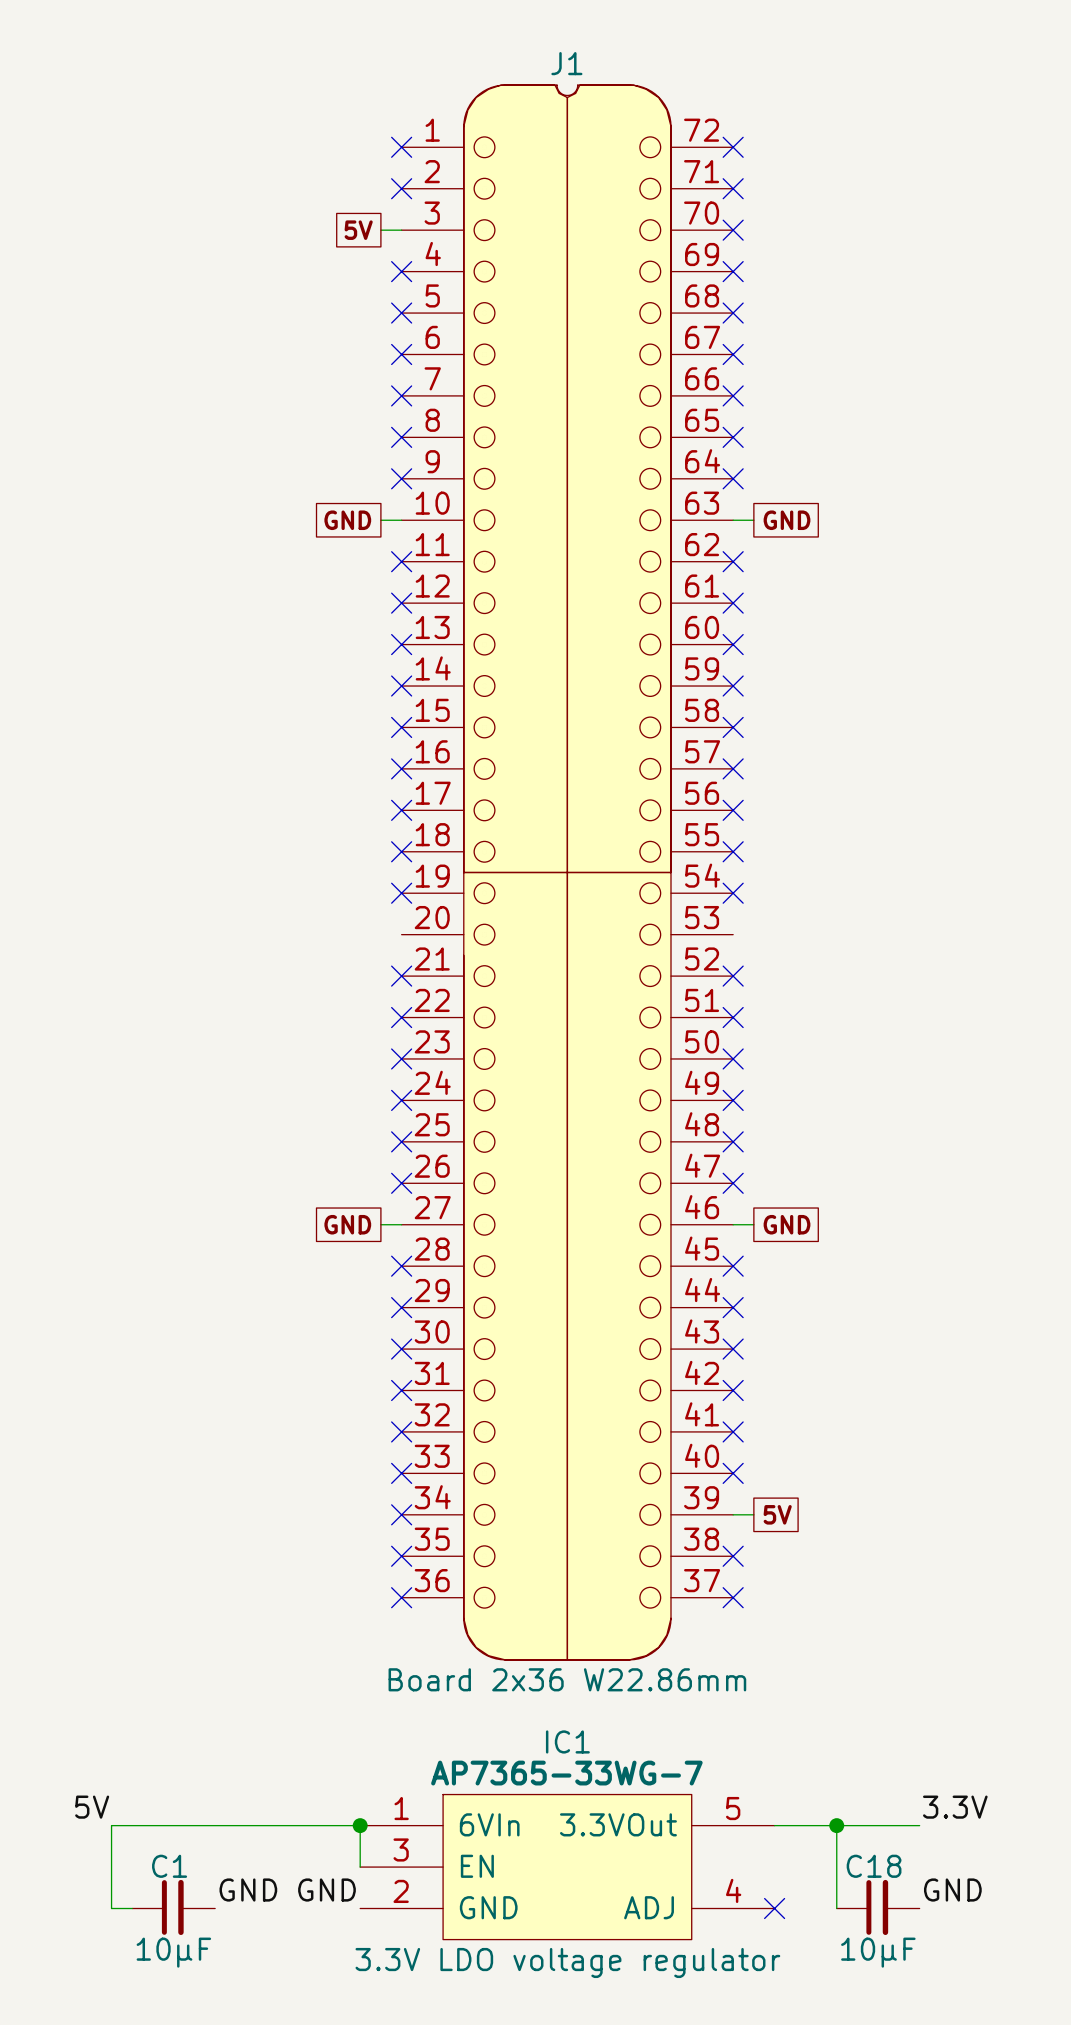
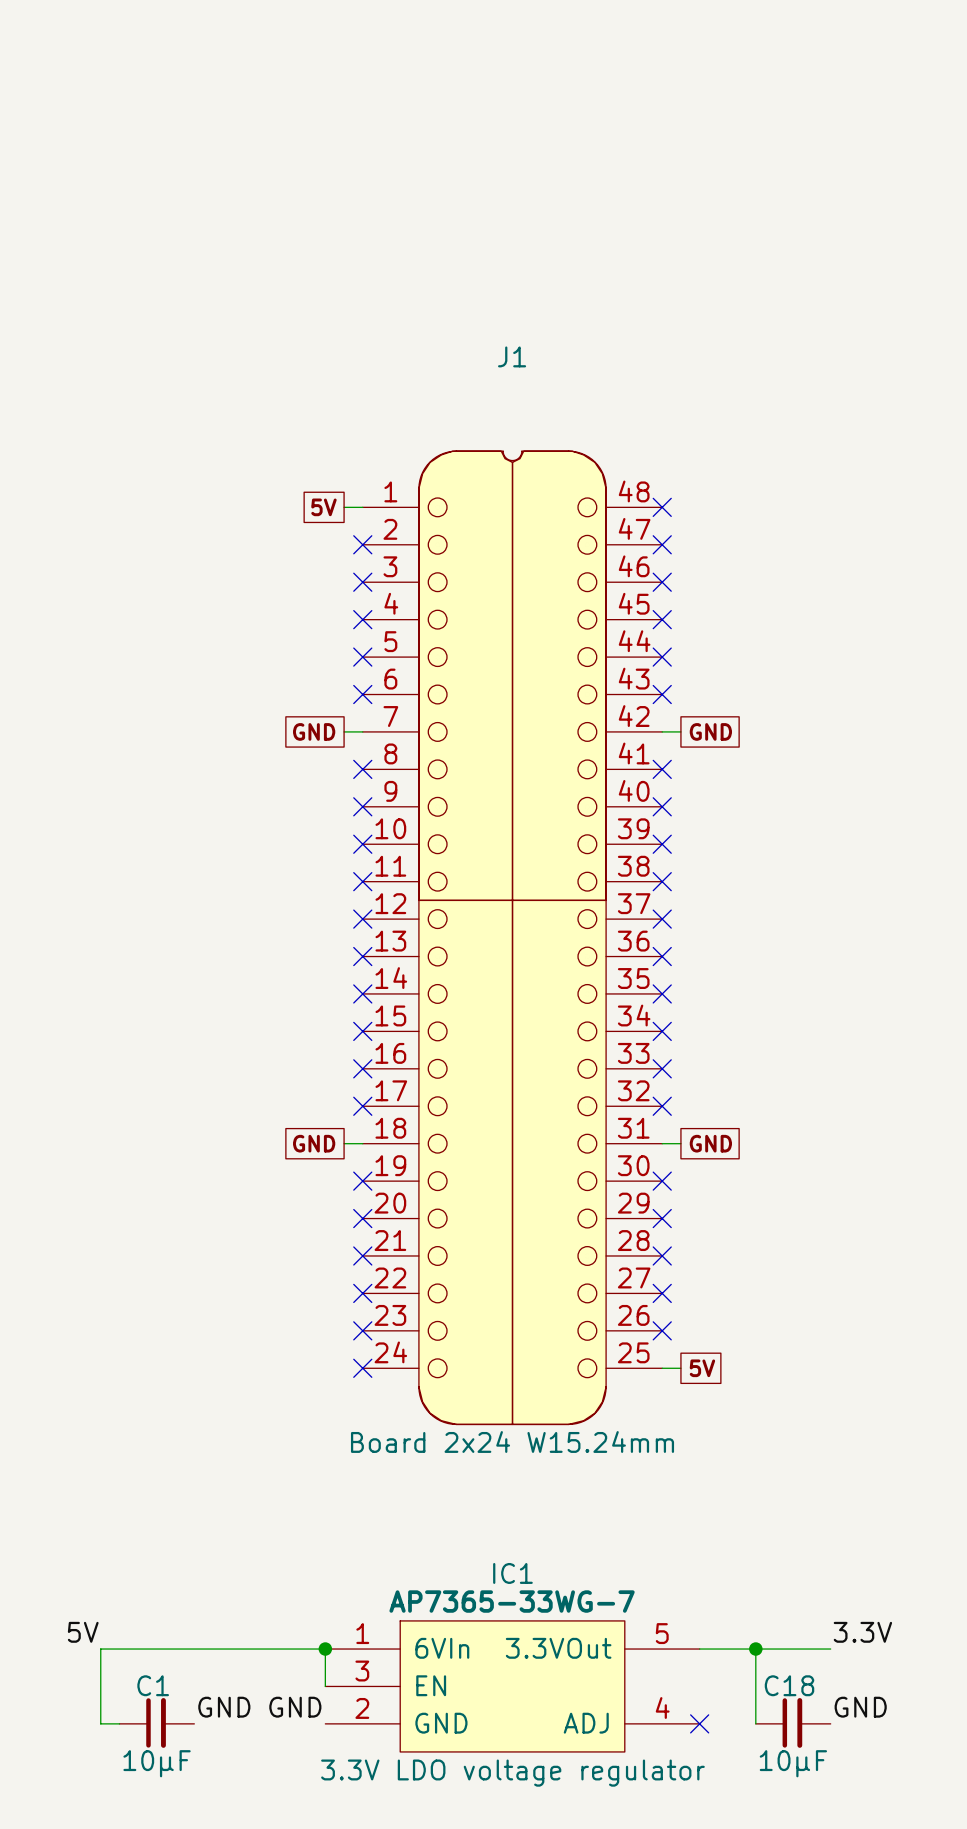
J1 name position: J1 (566, 63) -> J1 (512, 356)
J1 symbol: [401, 85, 734, 1660] -> [362, 451, 663, 1425]
no-connect mark: (401, 147) -> none
no-connect mark: (733, 147) -> none
no-connect mark: (401, 188) -> none
no-connect mark: (733, 188) -> none
global label position: 5V (358, 230) -> 5V (323, 507)
wire: (380, 230) (401, 230) -> none
no-connect mark: (733, 230) -> none
no-connect mark: (401, 271) -> none
no-connect mark: (733, 271) -> none
no-connect mark: (401, 313) -> none
no-connect mark: (733, 313) -> none
no-connect mark: (401, 354) -> none
no-connect mark: (733, 354) -> none
no-connect mark: (401, 395) -> none
no-connect mark: (733, 395) -> none
no-connect mark: (401, 437) -> none
no-connect mark: (733, 437) -> none
no-connect mark: (401, 478) -> none
no-connect mark: (733, 478) -> none
global label: GND (347, 520) -> none
wire: (380, 520) (401, 520) -> (344, 507) (362, 507)
wire: (733, 520) (753, 520) -> (662, 731) (680, 731)
global label: GND (787, 520) -> none
no-connect mark: (401, 561) -> none
global label: none -> GND (314, 731)
wire: none -> (344, 731) (362, 731)
no-connect mark: (401, 810) -> none
no-connect mark: (733, 810) -> none
global label: none -> GND (710, 731)
no-connect mark: none -> (362, 844)
no-connect mark: none -> (662, 844)
global label position: GND (347, 1224) -> GND (314, 1143)
wire: (380, 1224) (401, 1224) -> (344, 1143) (362, 1143)
wire: (733, 1224) (753, 1224) -> (662, 1143) (680, 1143)
global label position: GND (787, 1224) -> GND (710, 1143)
no-connect mark position: (401, 1266) -> (362, 1106)
no-connect mark position: (733, 1266) -> (662, 1106)
no-connect mark: (401, 1556) -> none
no-connect mark: (733, 1556) -> none
no-connect mark: (401, 1597) -> none
no-connect mark: (733, 1597) -> none
J1 value: Board 2x36 W22.86mm (567, 1679) -> Board 2x24 W15.24mm (512, 1442)

